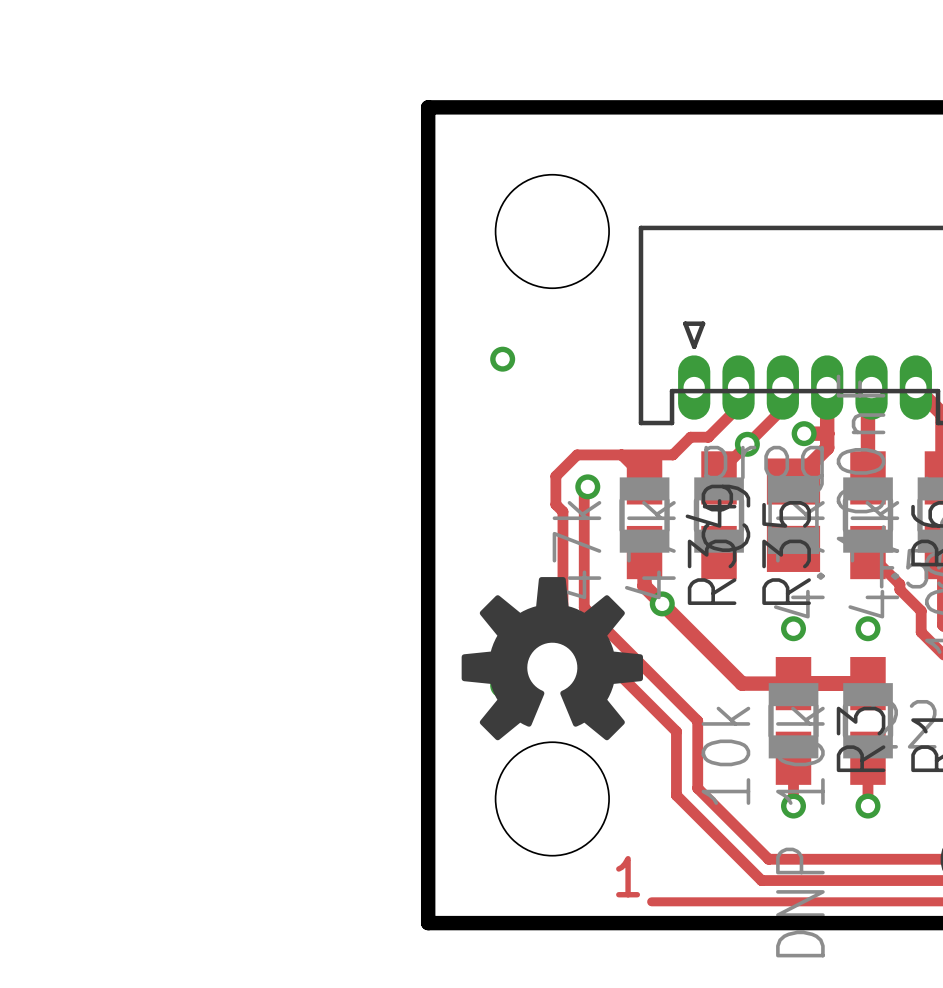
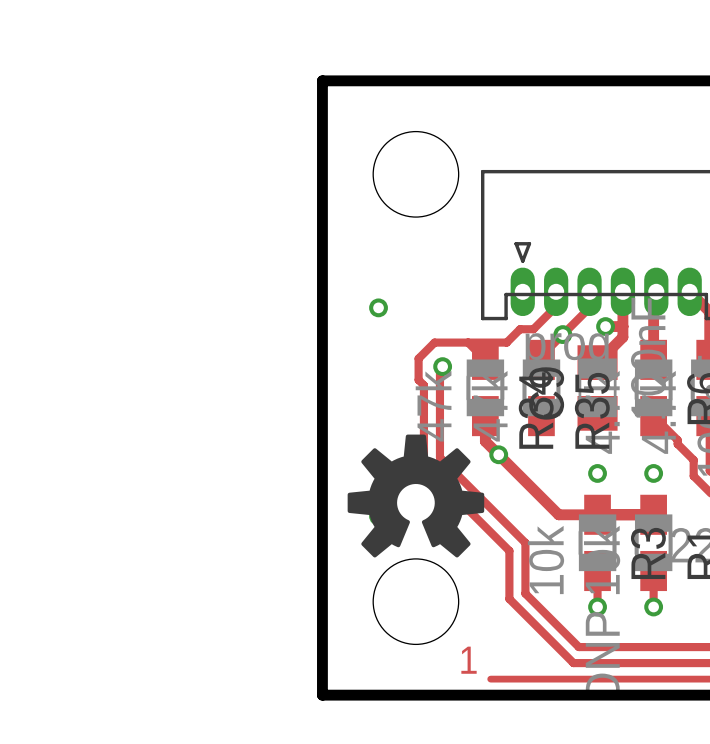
via position: (502, 359) -> (378, 307)

